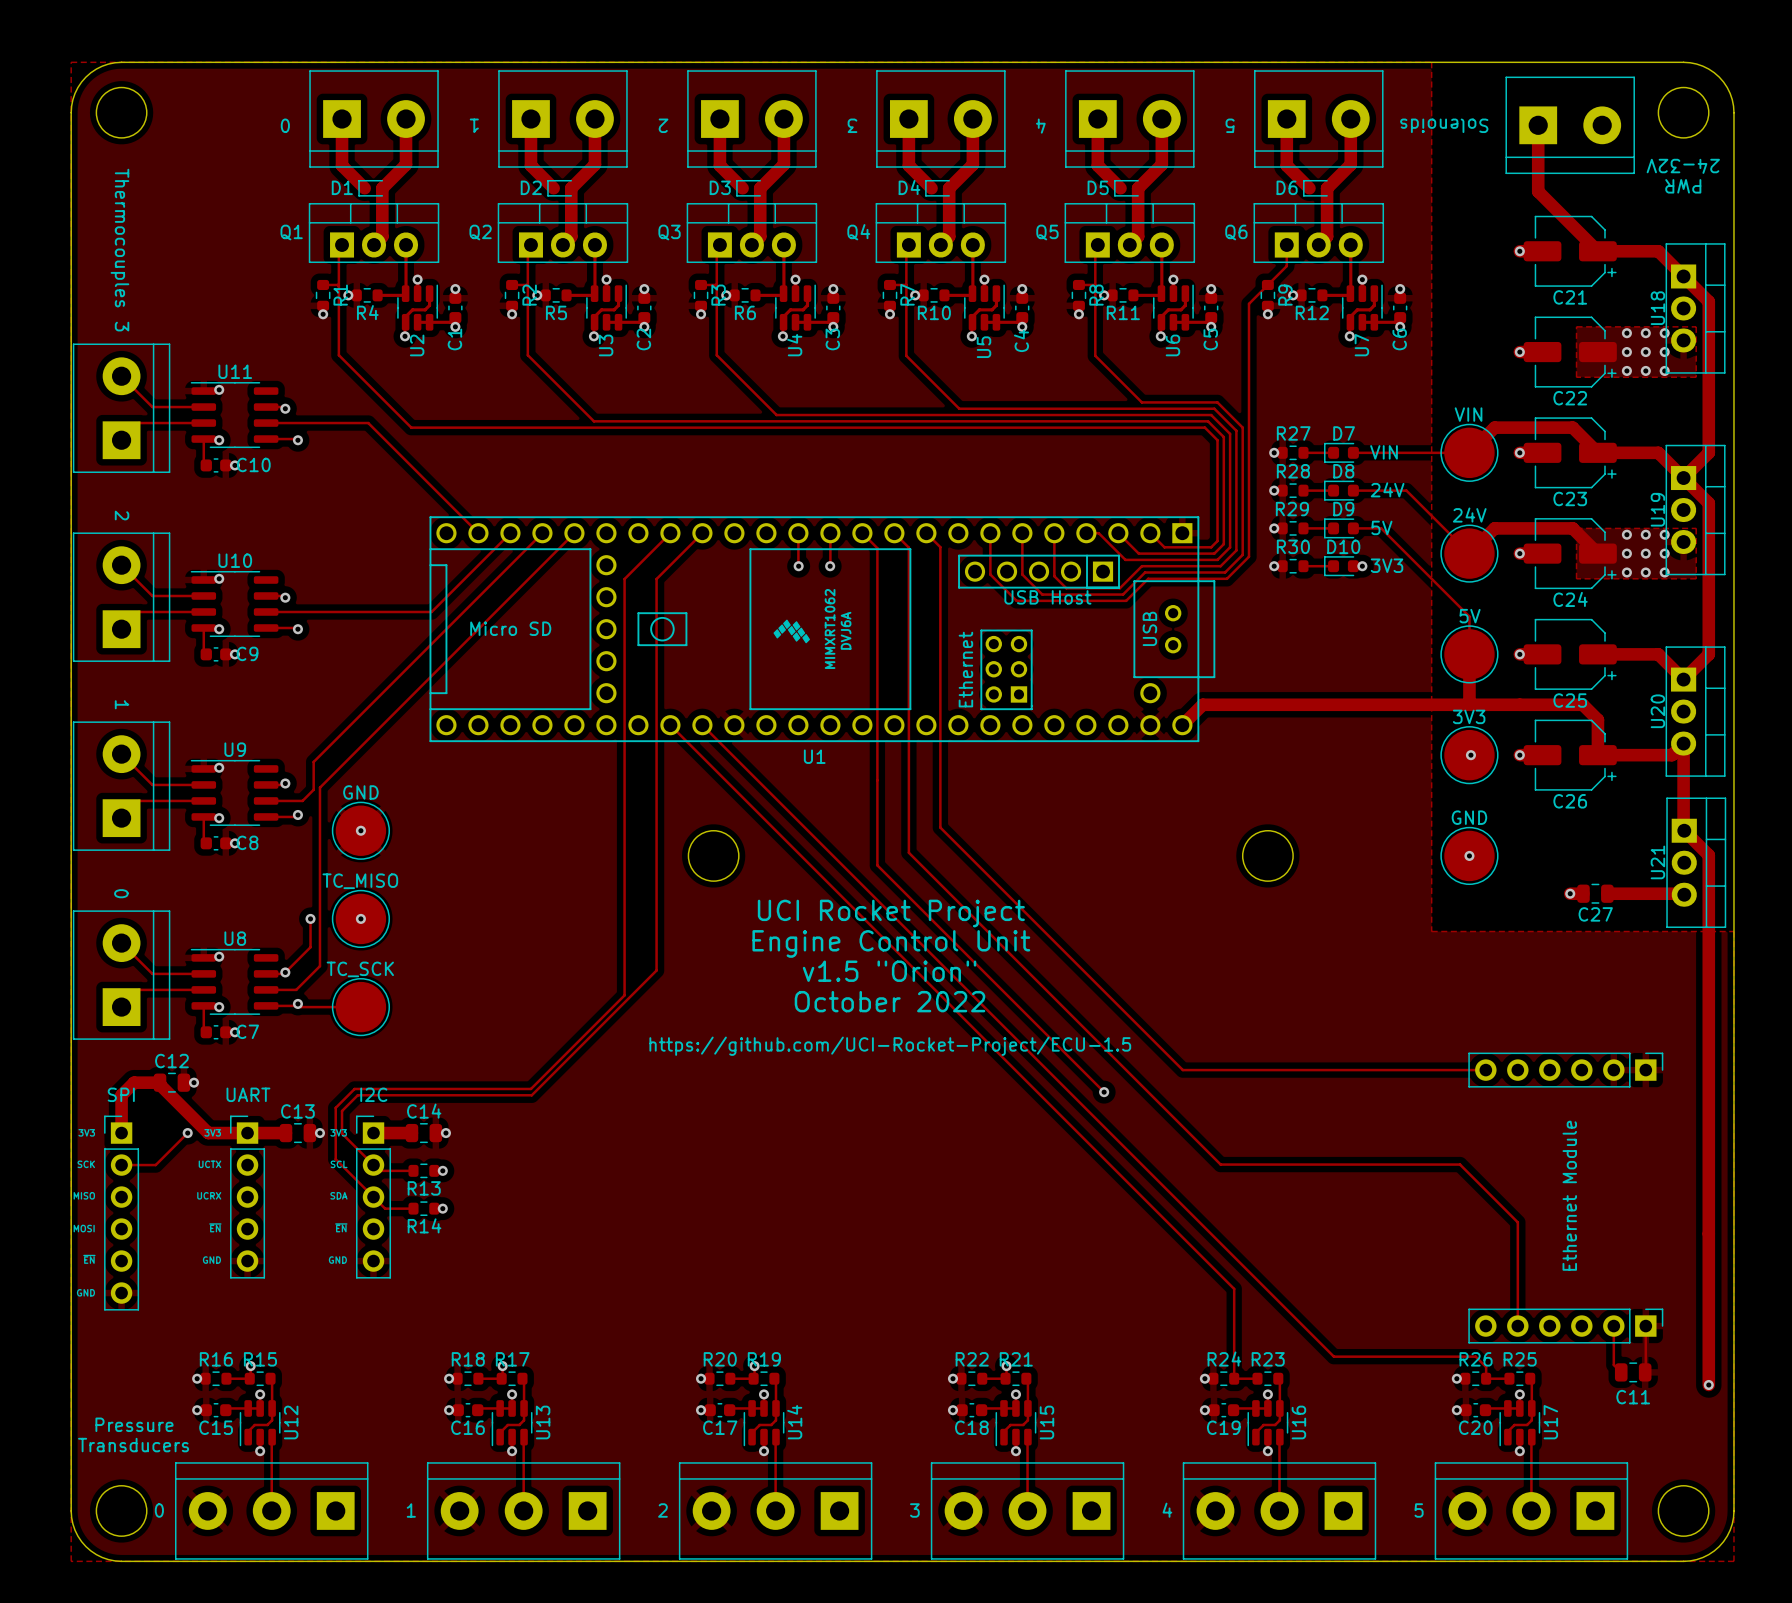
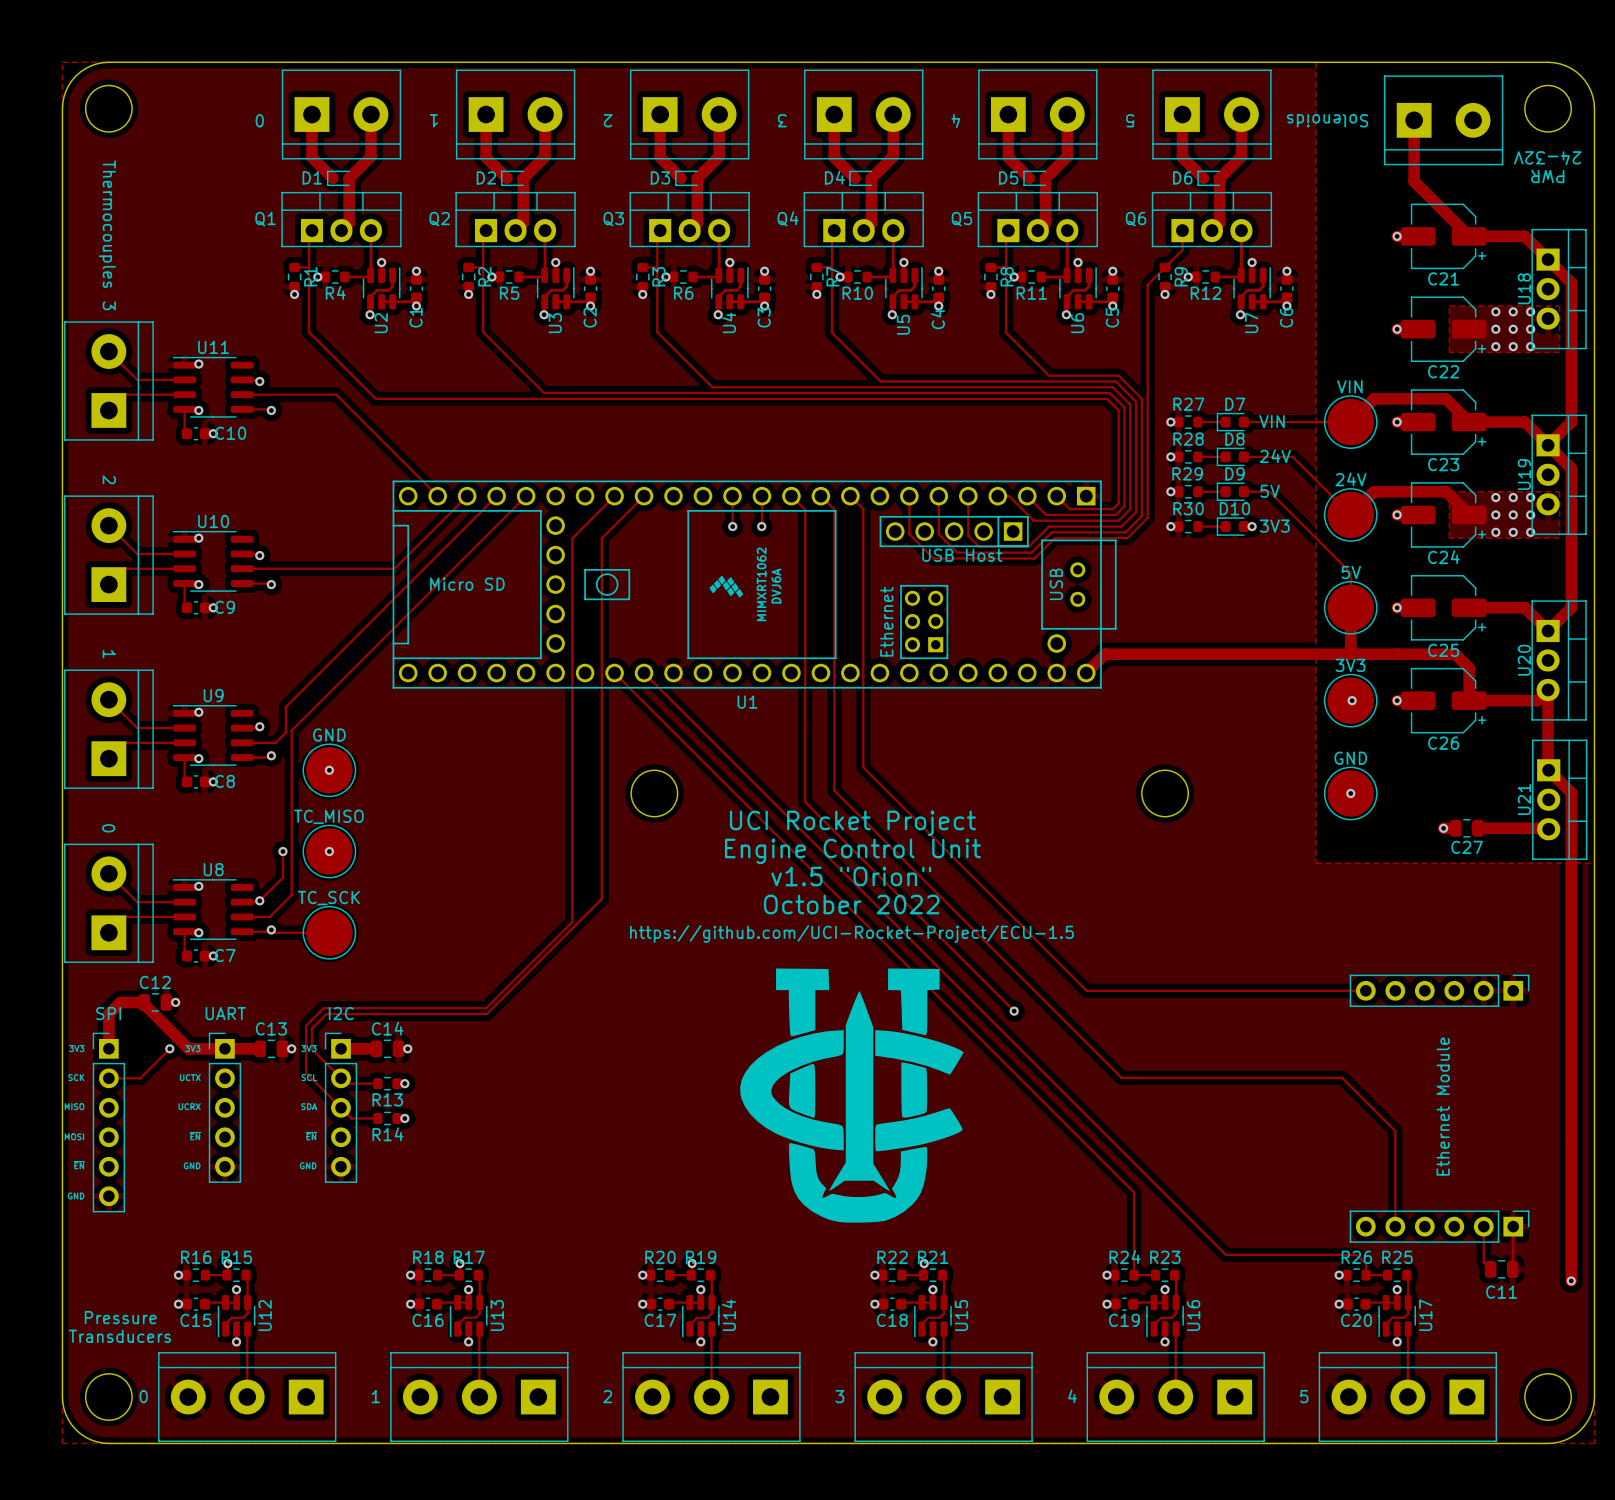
text position: UCI Rocket Project (891, 913) -> UCI Rocket Project (852, 823)
text position: Engine Control Unit (891, 943) -> Engine Control Unit (852, 851)
text position: v1.5 "Orion" (889, 971) -> v1.5 "Orion" (851, 876)
text position: October 2022 (889, 1001) -> October 2022 (851, 904)
drawing: none -> [740, 968, 964, 1223]
text position: https://github.com/UCI-Rocket-Project/ECU-1.5 (890, 1046) -> https://github.com/UCI-Rocket-Project/ECU-1.5 (851, 933)

